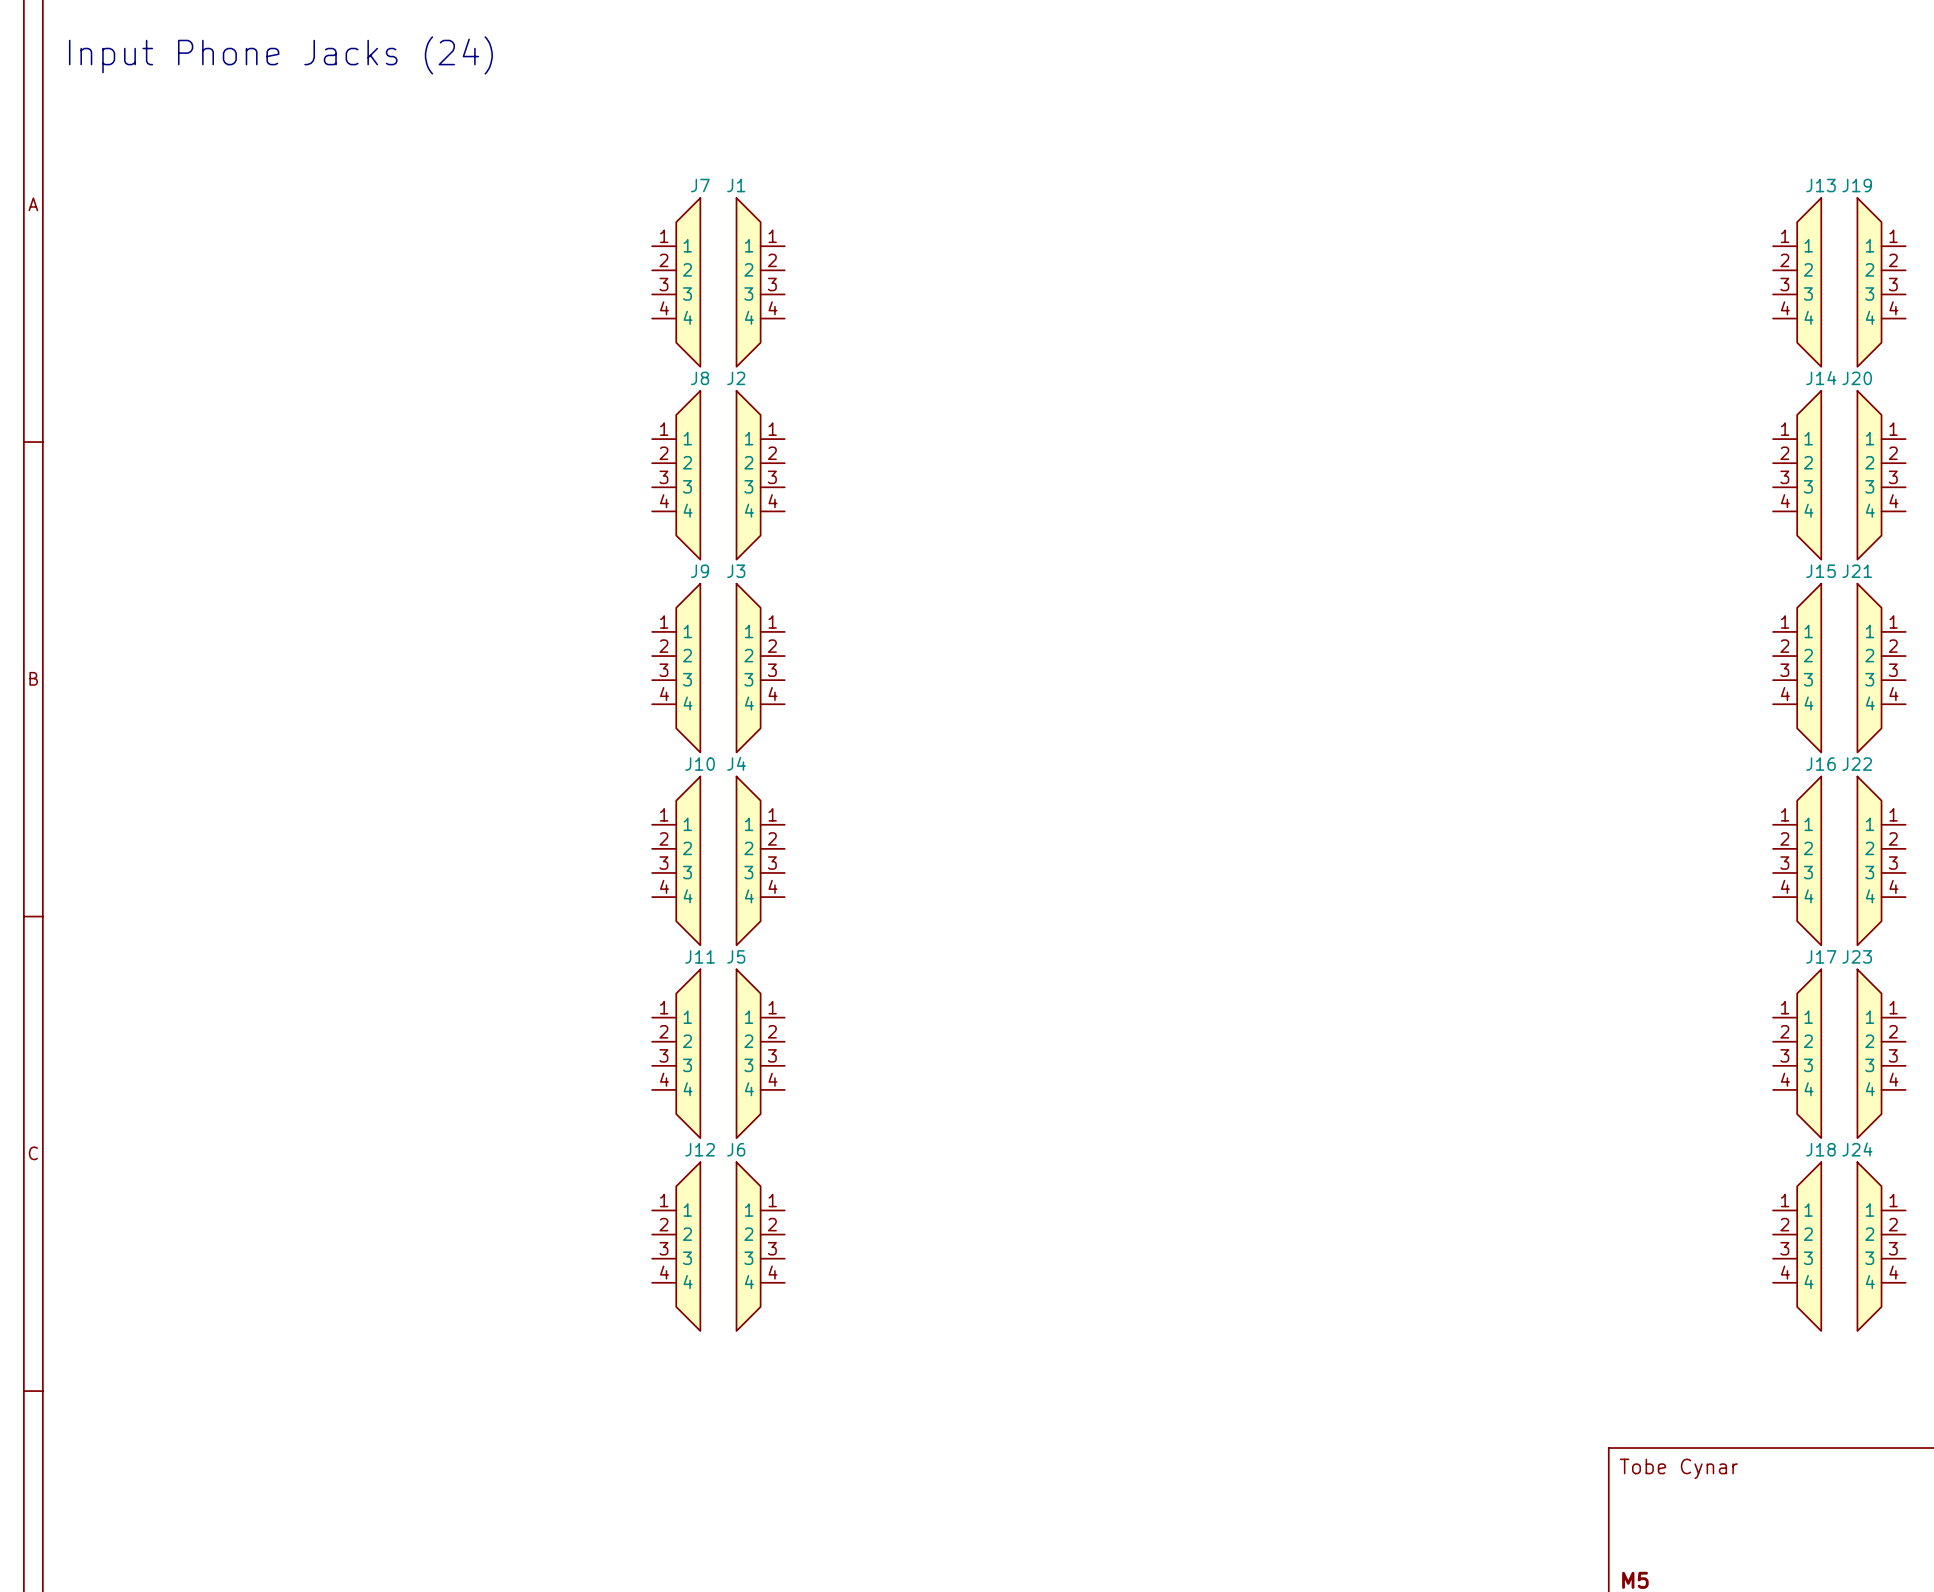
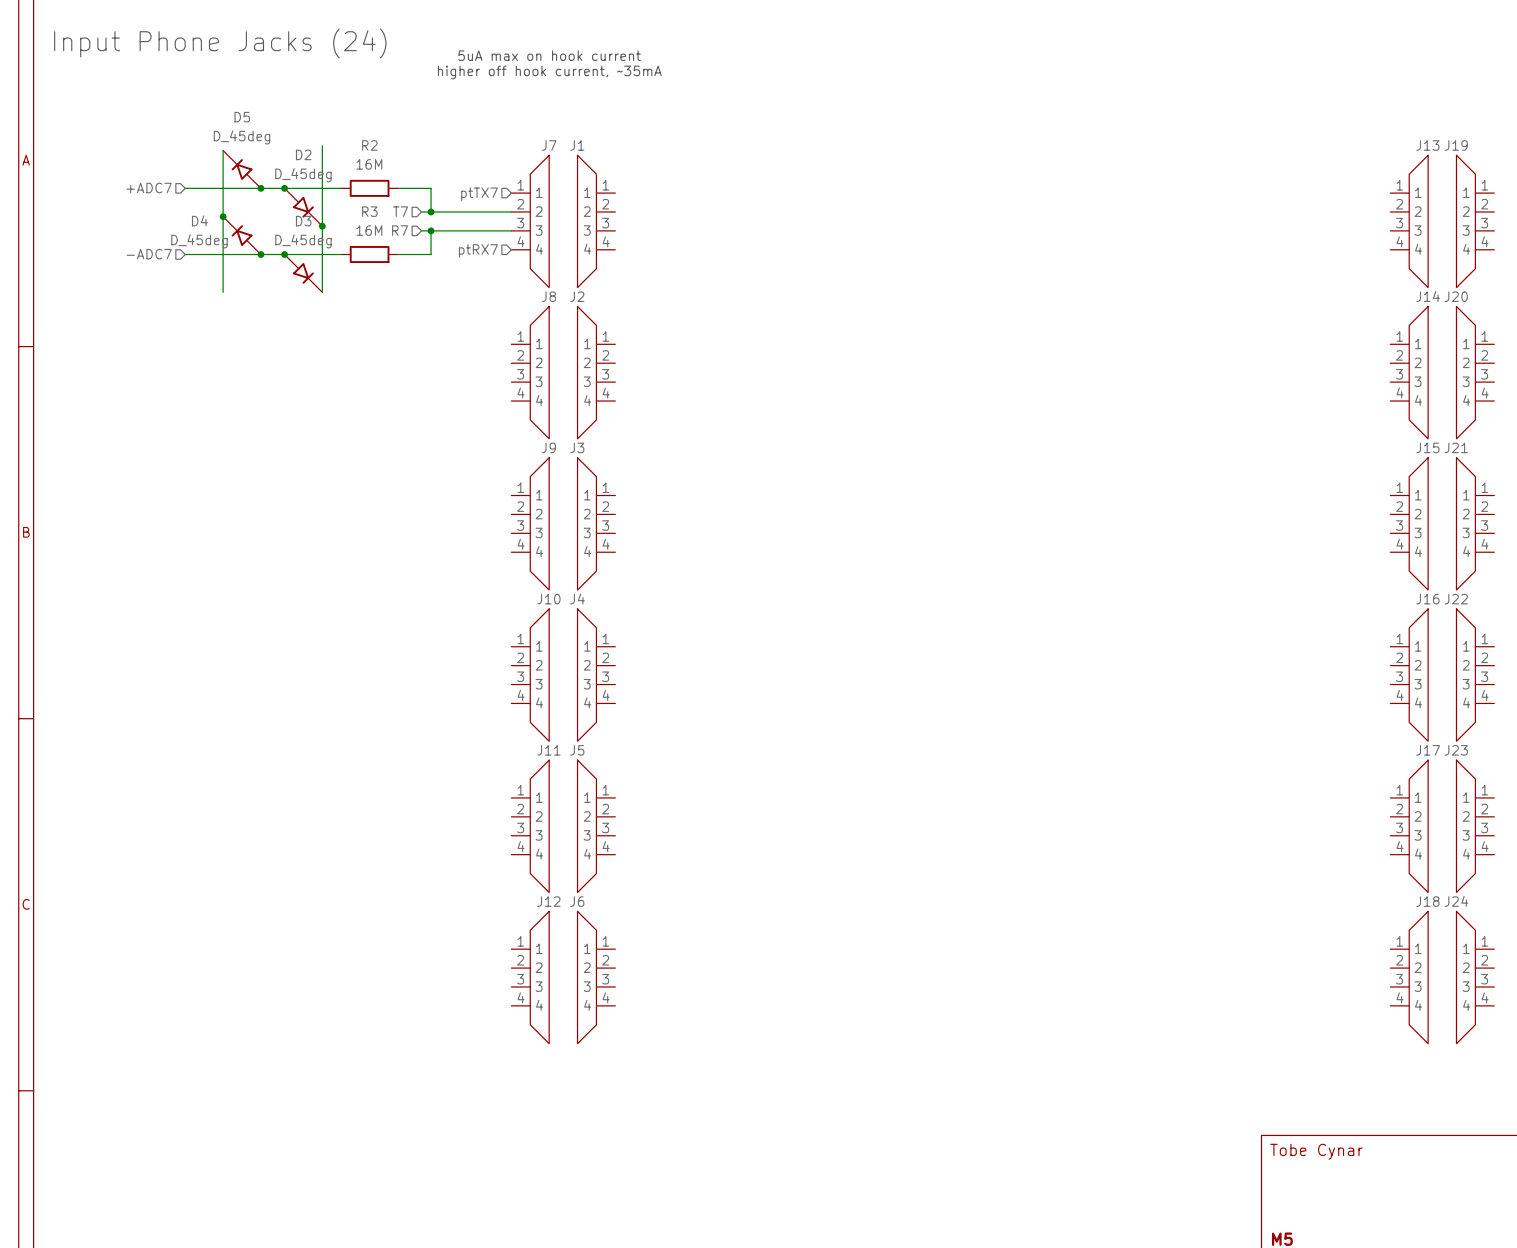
text: none -> 5uA max on hook current (549, 55)
text: none -> higher off hook current, ~35mA (549, 72)
wire: none -> (322, 145) (322, 292)
wire: none -> (223, 150) (223, 292)
D5: none -> D_45deg (242, 169)
hierarchical label: none -> +ADC7 (149, 188)
wire: none -> (185, 188) (341, 188)
junction: none -> (260, 188)
junction: none -> (284, 188)
R2: none -> 16M (369, 188)
wire: none -> (397, 188) (431, 188) (431, 211)
hierarchical label: none -> ptTX7 (479, 194)
D2: none -> D_45deg (303, 207)
hierarchical label: none -> T7 (400, 211)
wire: none -> (421, 211) (511, 211)
junction: none -> (431, 211)
junction: none -> (223, 216)
junction: none -> (322, 226)
hierarchical label: none -> R7 (400, 230)
wire: none -> (421, 230) (511, 230)
wire: none -> (431, 230) (431, 254) (397, 254)
junction: none -> (431, 230)
D4: none -> D_45deg (242, 235)
hierarchical label: none -> ptRX7 (478, 251)
hierarchical label: none -> -ADC7 (149, 254)
wire: none -> (185, 254) (341, 254)
junction: none -> (260, 254)
junction: none -> (284, 254)
R3: none -> 16M (369, 254)
D3: none -> D_45deg (303, 273)

